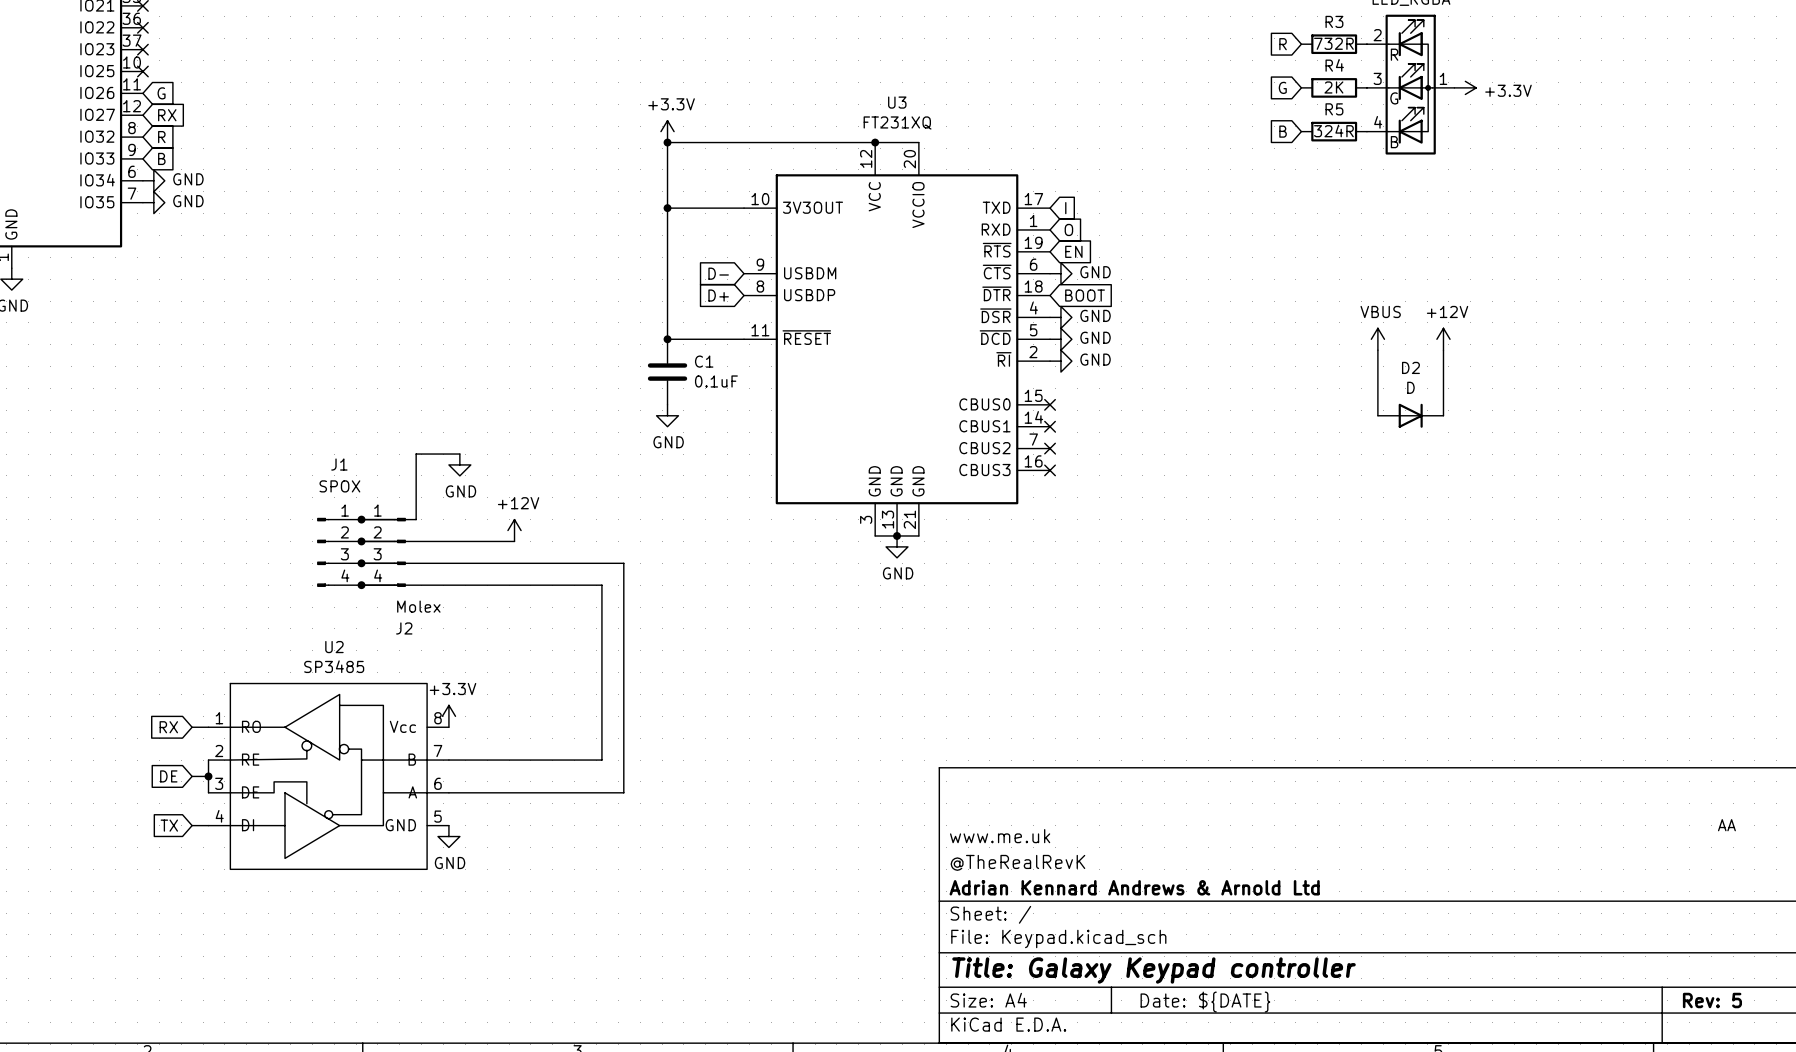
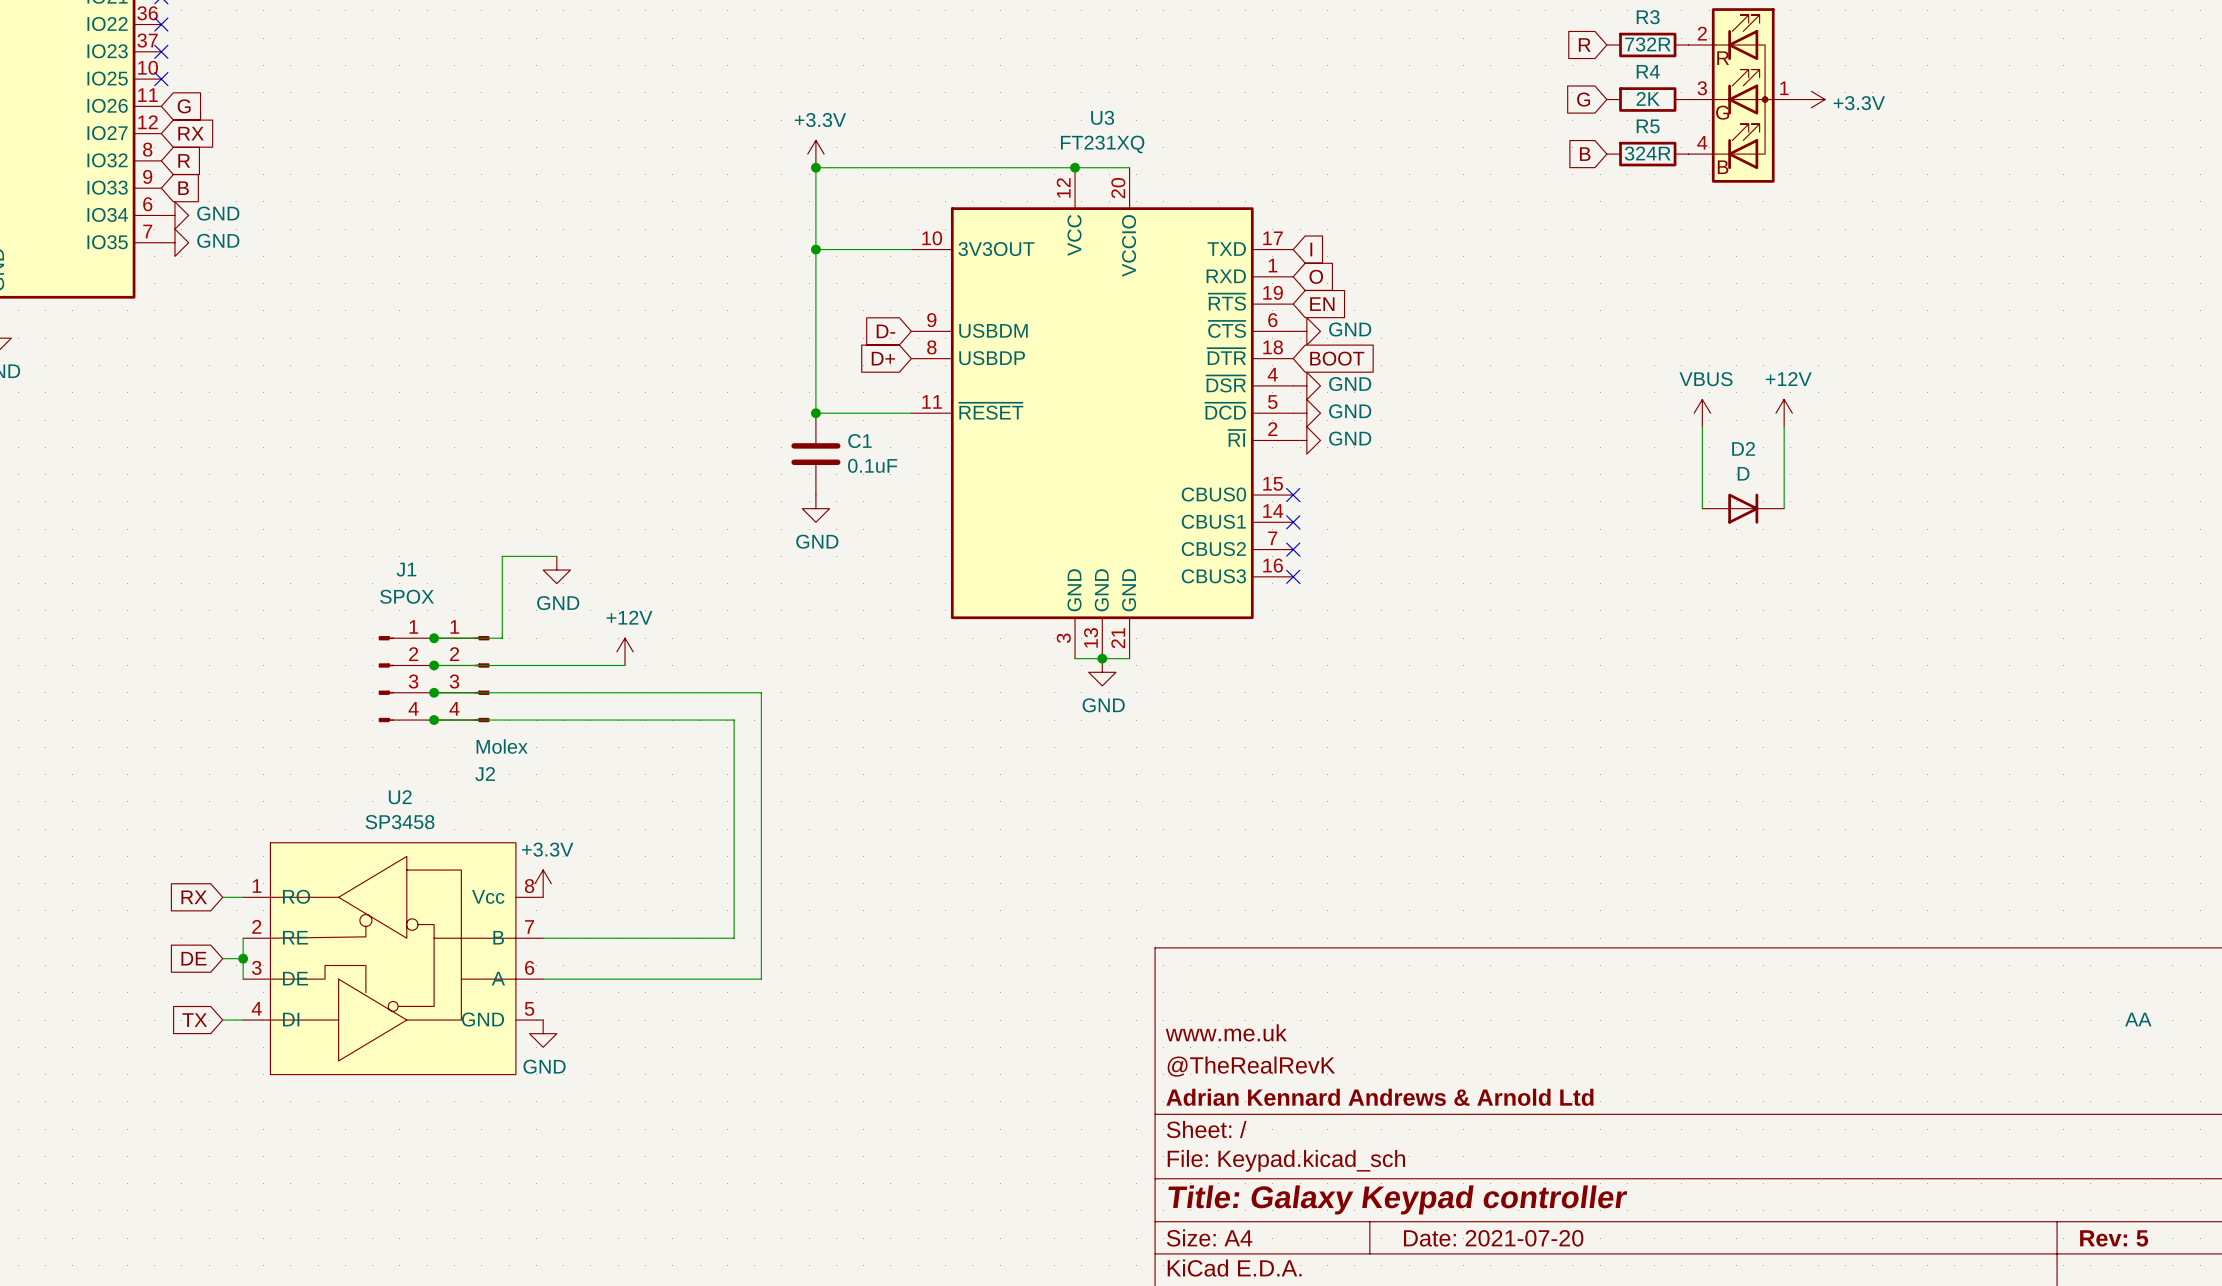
U2 value: SP3485 (334, 666) -> SP3458 (400, 822)
title block: Date: ${DATE} (1205, 1002) -> Date: 2021-07-20 (1493, 1238)

